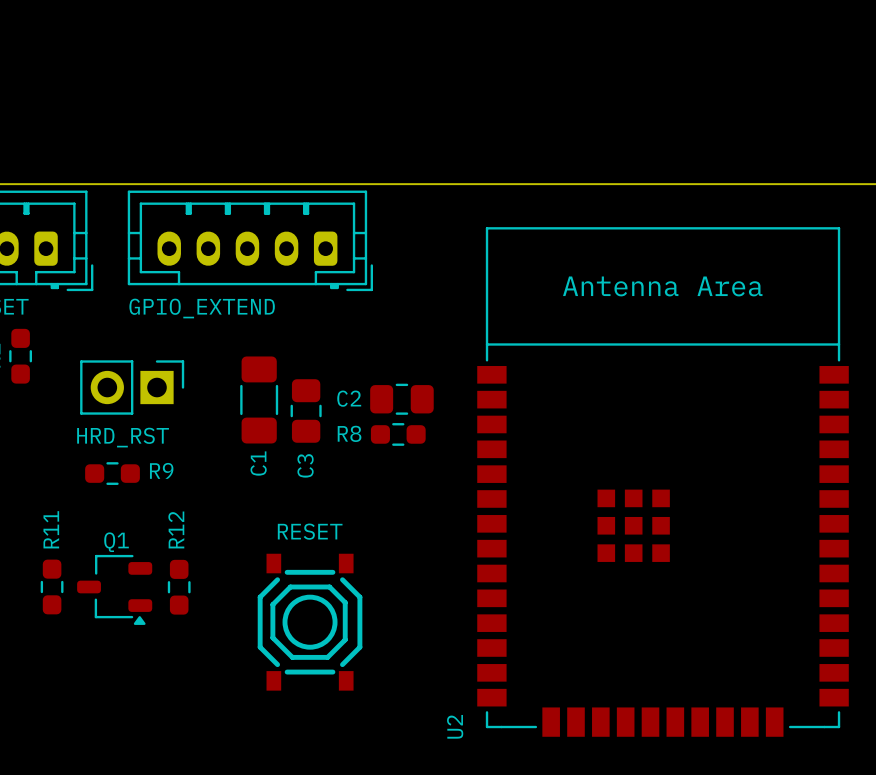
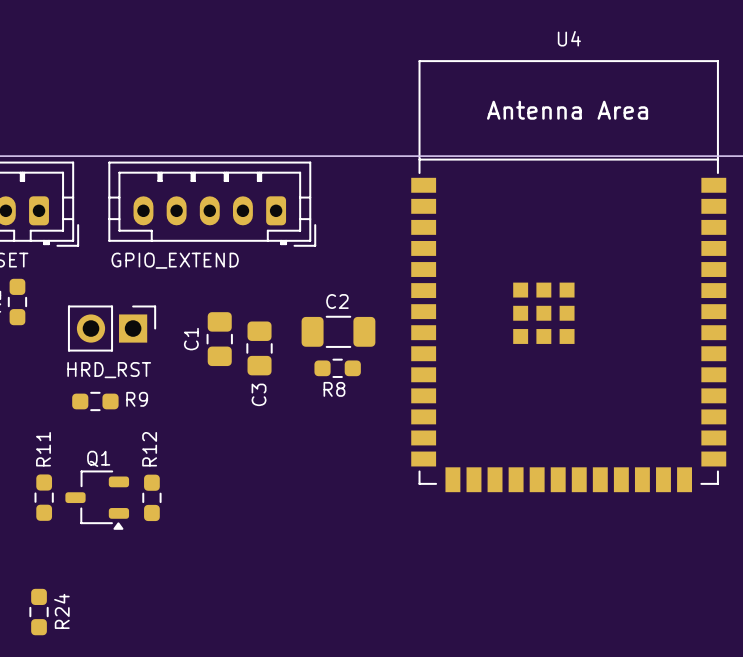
U4: none -> (568, 276)
C1 footprint: [240, 356, 279, 444] -> [206, 312, 233, 367]
C2 footprint: [370, 383, 434, 415] -> [301, 315, 376, 348]
C2 name position: C2 (349, 398) -> C2 (337, 301)
R8 name position: R8 (349, 433) -> R8 (334, 389)
C1 name position: C1 (258, 463) -> C1 (191, 339)
U2: (663, 481) -> none
text: RESET (310, 531) -> none
part: (310, 622) -> none
R24: none -> (39, 612)

